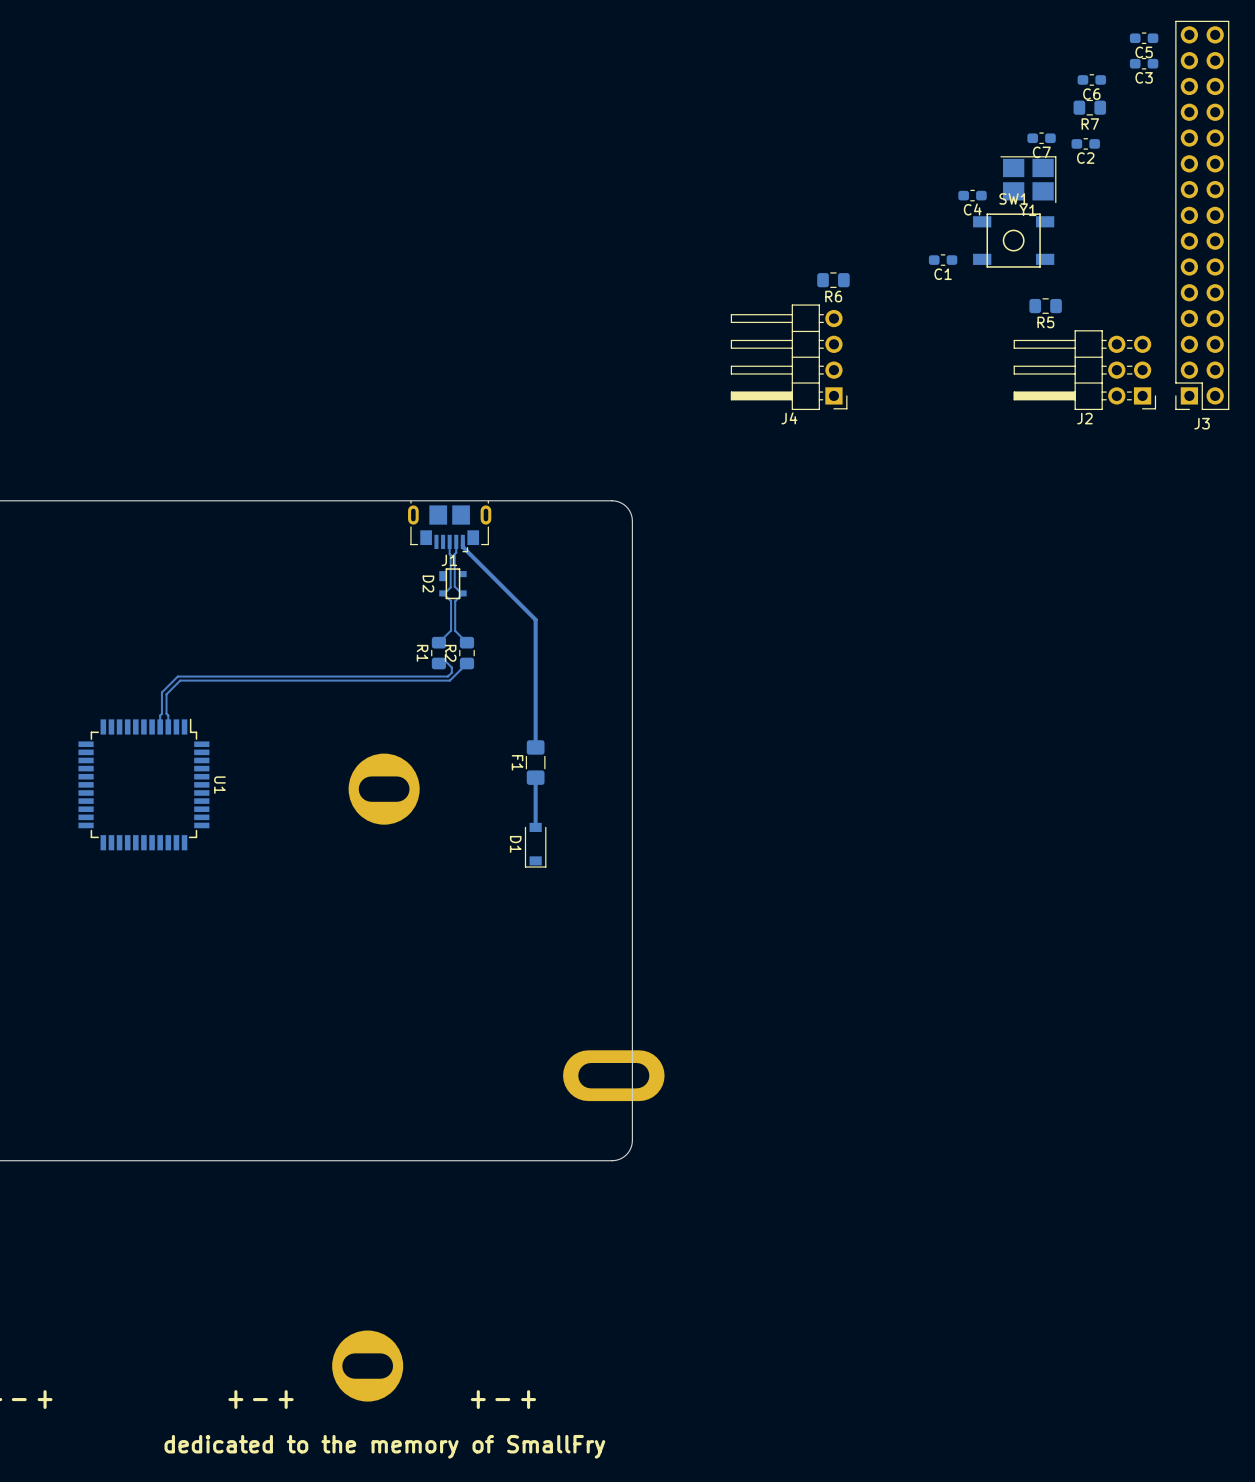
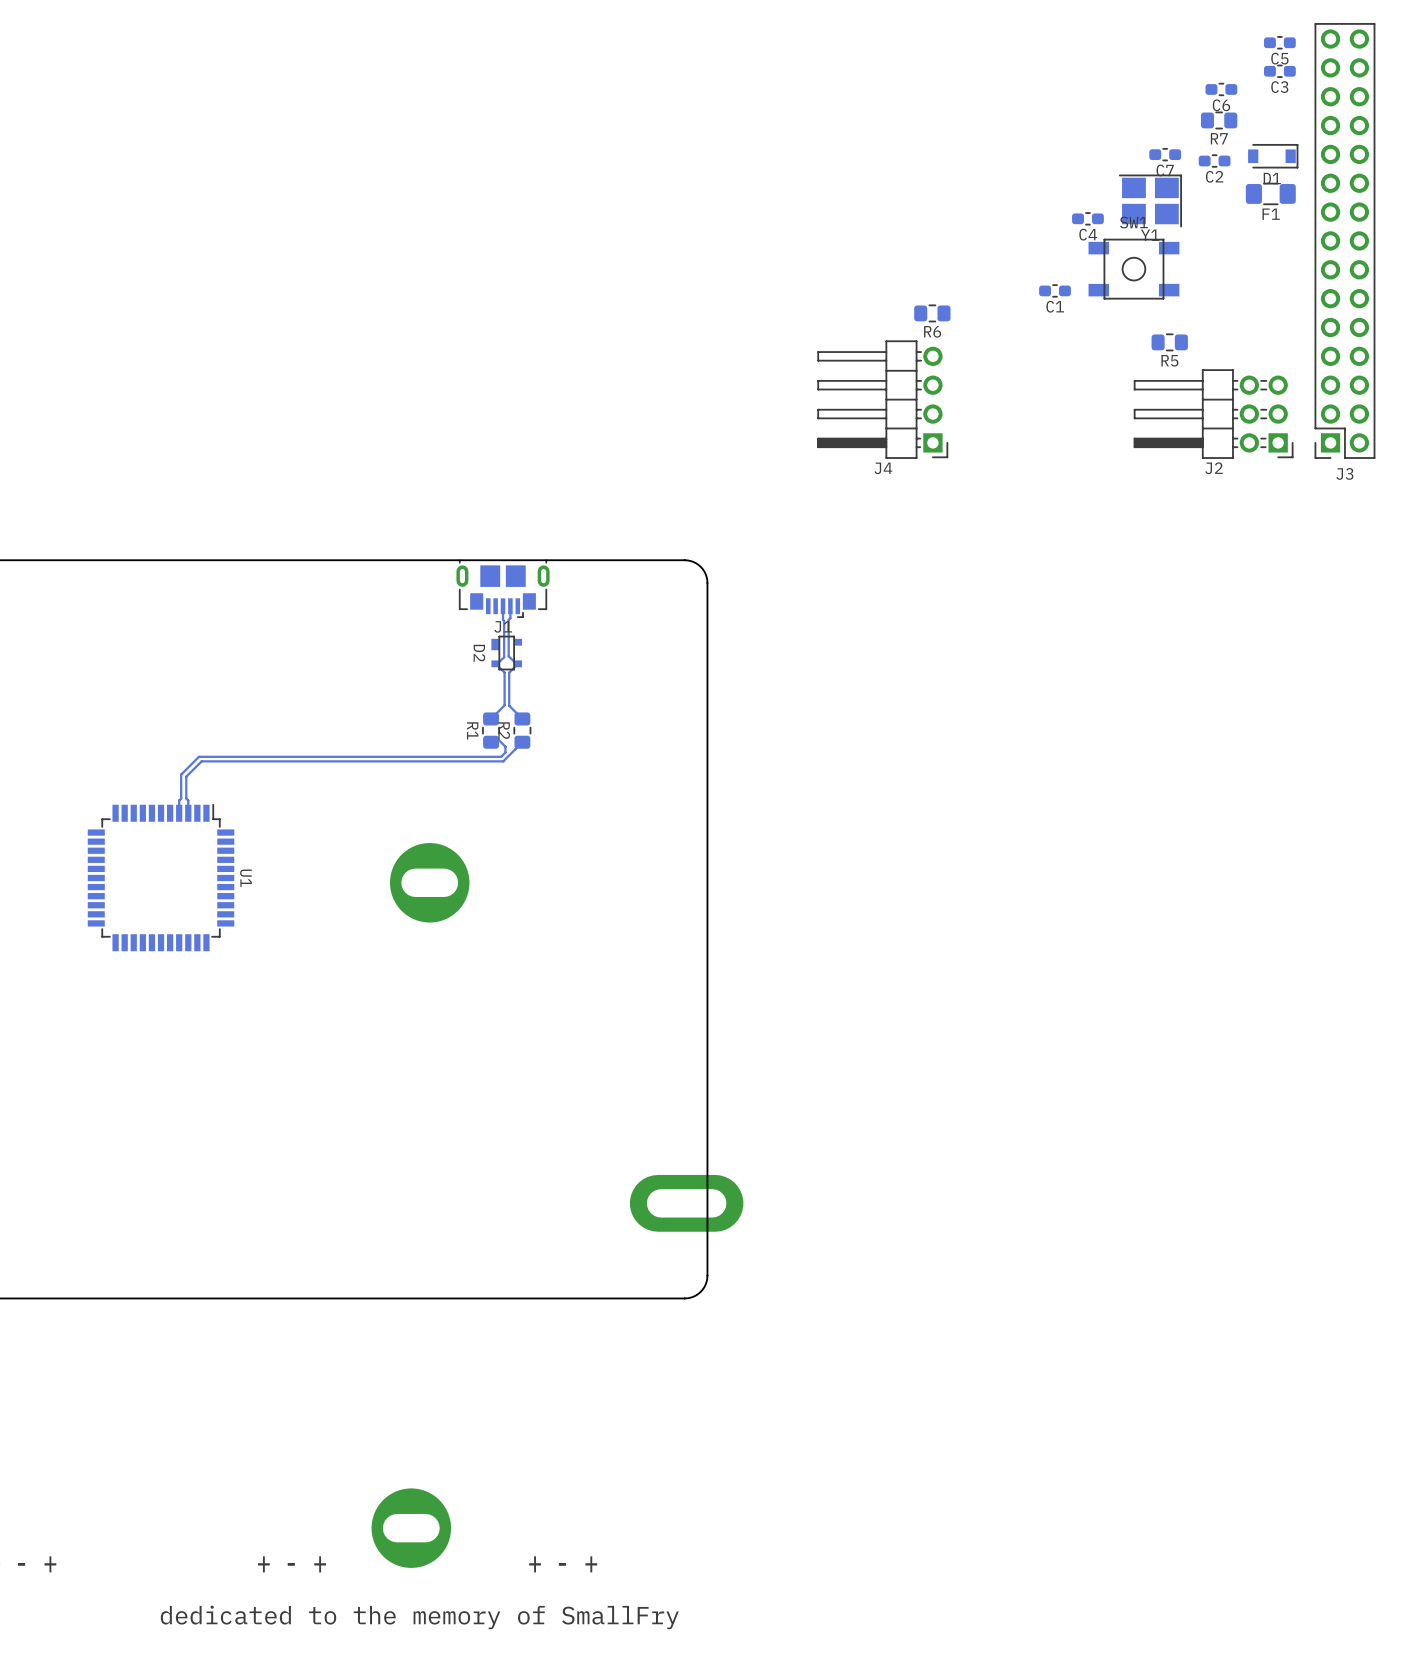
track: (462, 541) (462, 546) (535, 619) (535, 747) -> none
F1 name position: F1 (517, 762) -> F1 (1271, 214)
F1 rotation: 0° (535, 762) -> 90° clockwise (1270, 193)
F1 position: (535, 762) -> (1270, 193)
track: (535, 777) (535, 827) -> none
D1 rotation: 0° (535, 845) -> 90° counterclockwise (1273, 156)
D1 position: (535, 845) -> (1273, 156)

